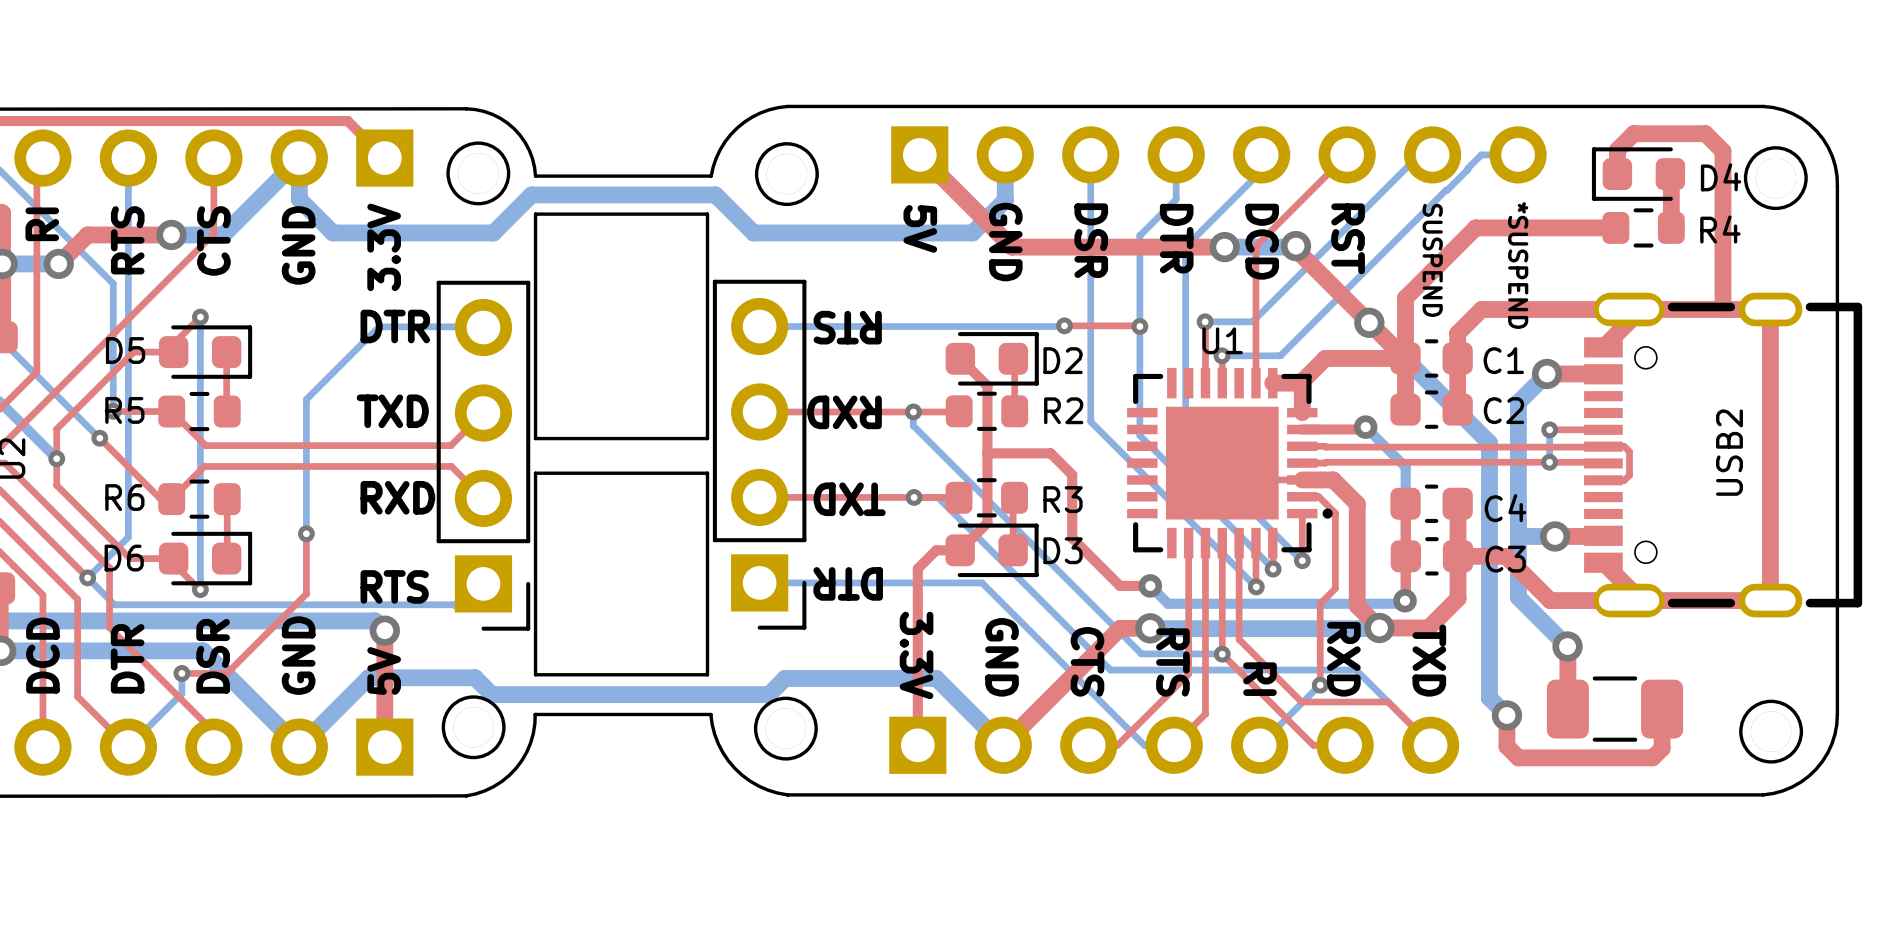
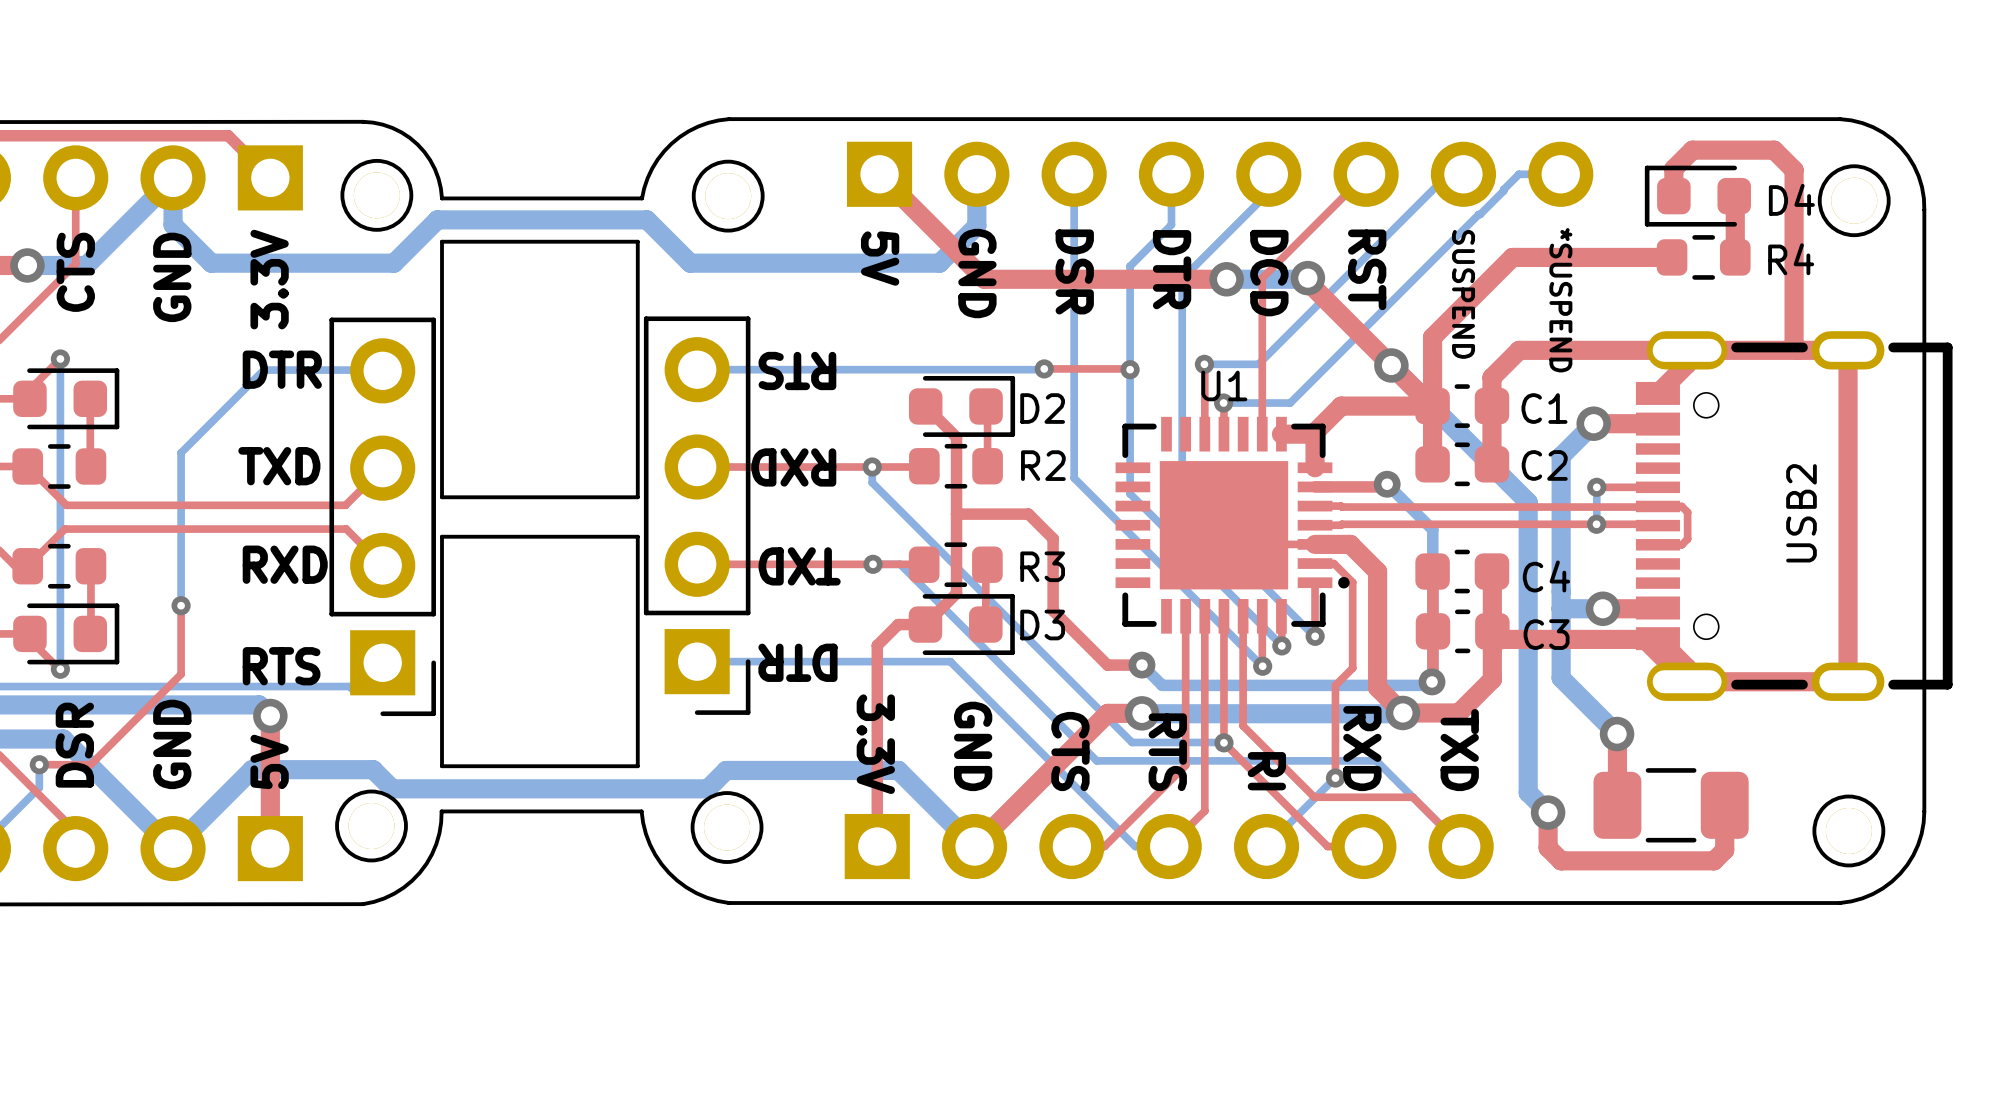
top track: (1458, 556) (1505, 556) (1550, 600) (1629, 600) -> (1492, 631) (1500, 639) (1644, 639) (1687, 681)

